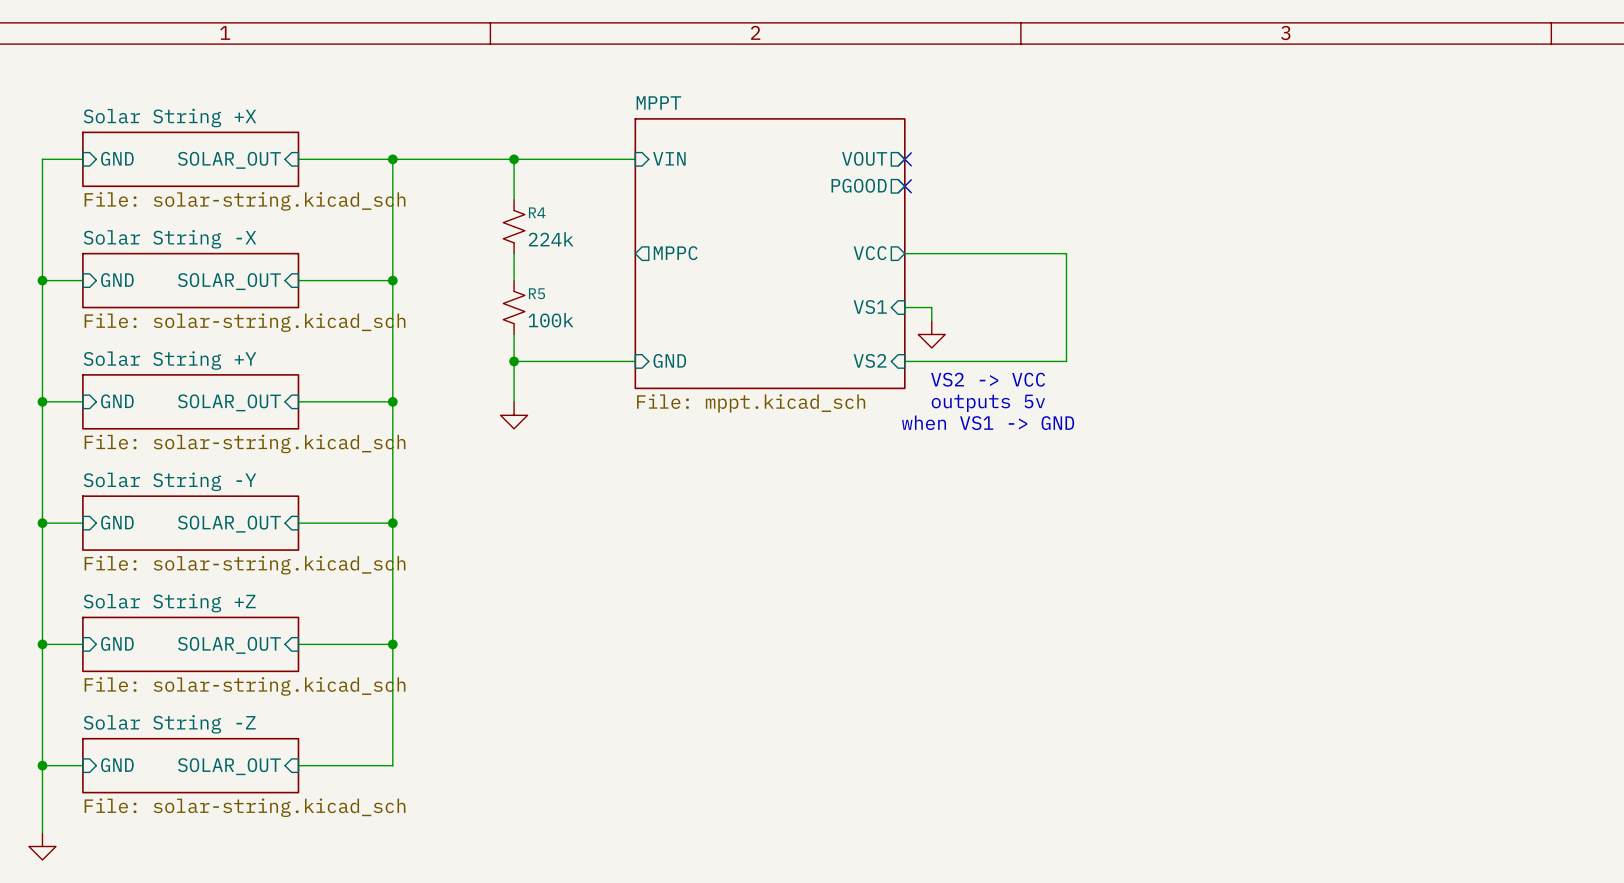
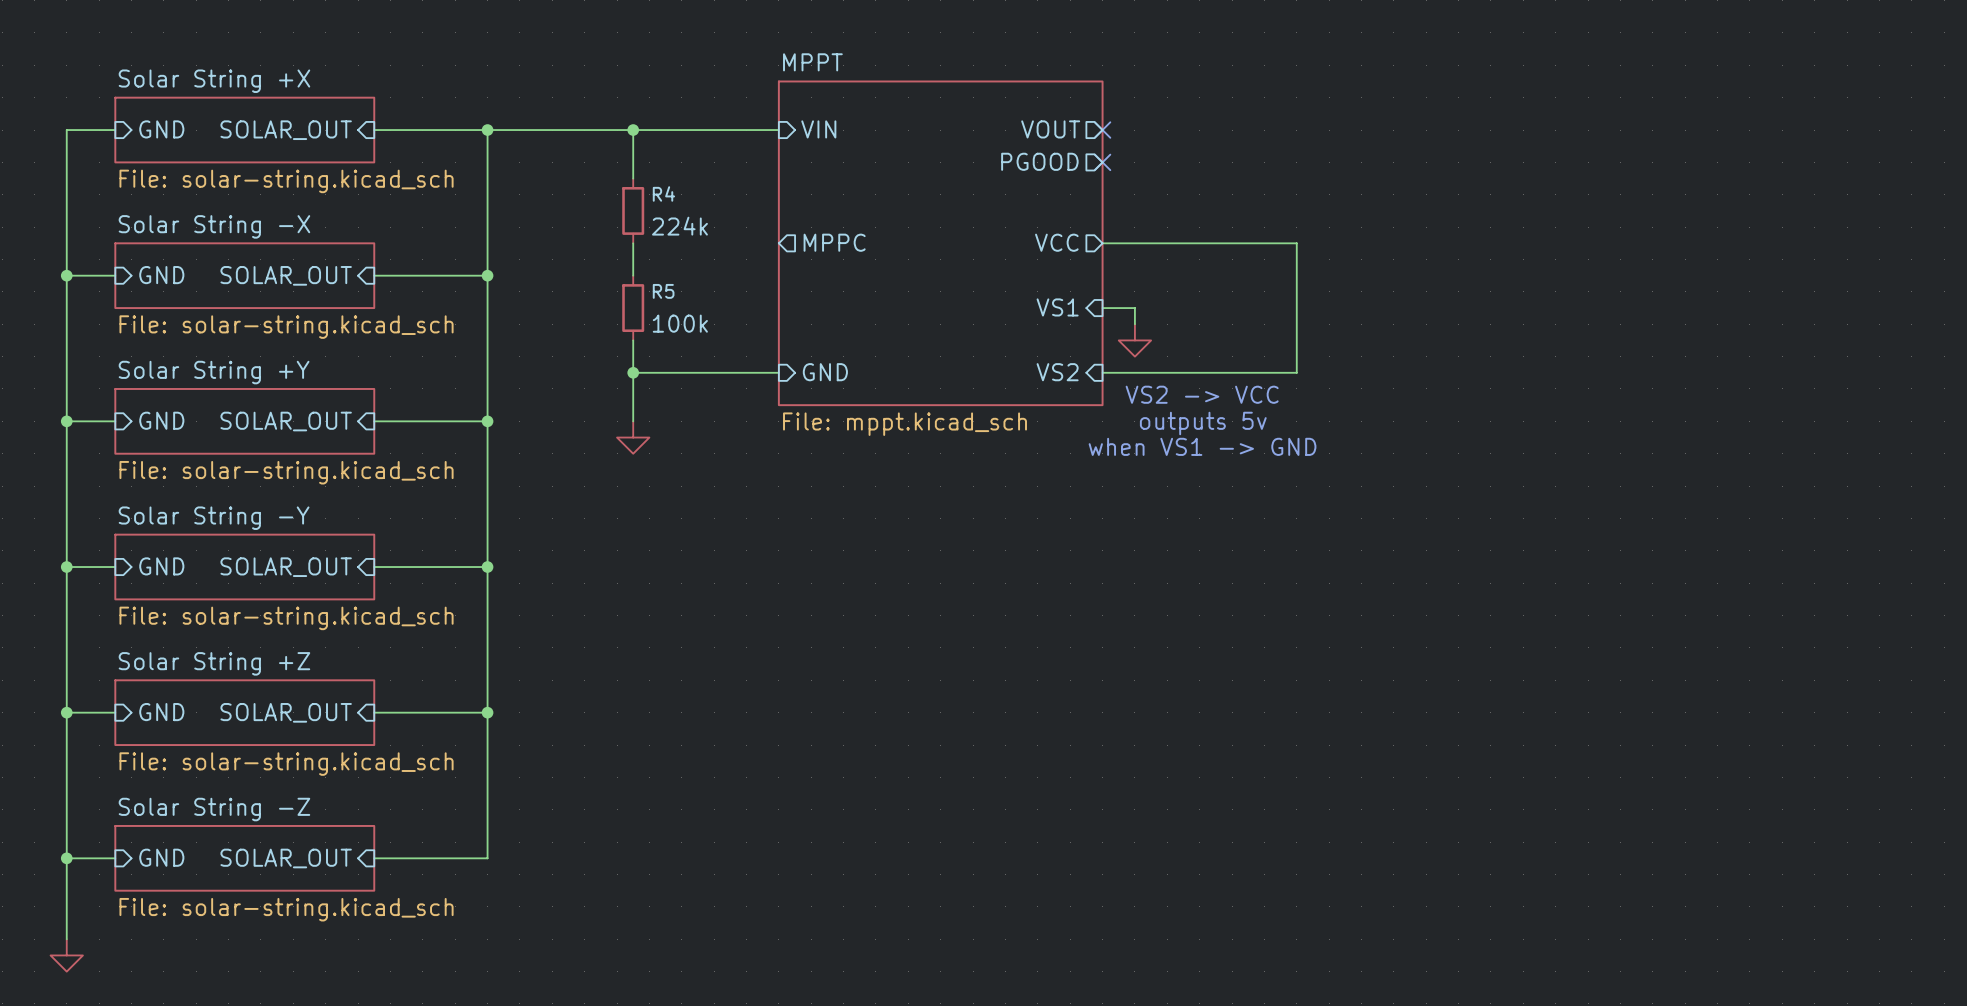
R4 symbol: [503, 199, 525, 254] -> [622, 178, 645, 244]
R5 symbol: [503, 280, 525, 335] -> [622, 275, 645, 341]

